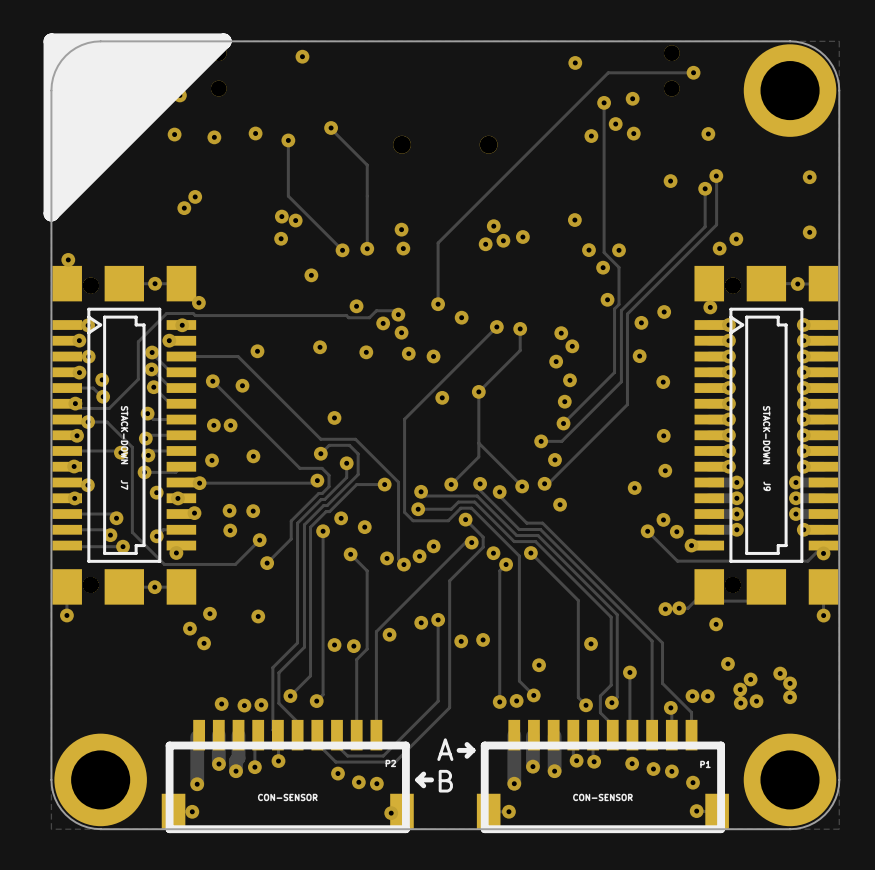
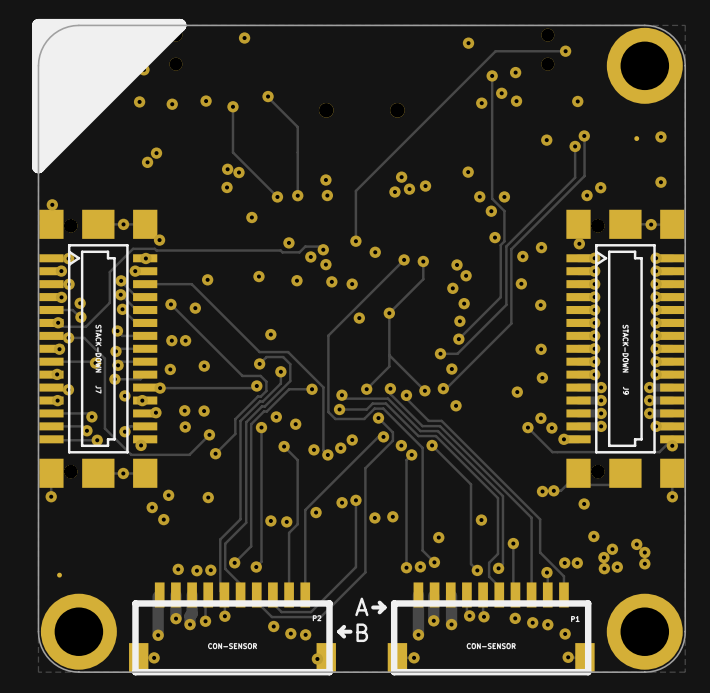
part: none -> (636, 138)
part: none -> (59, 575)

